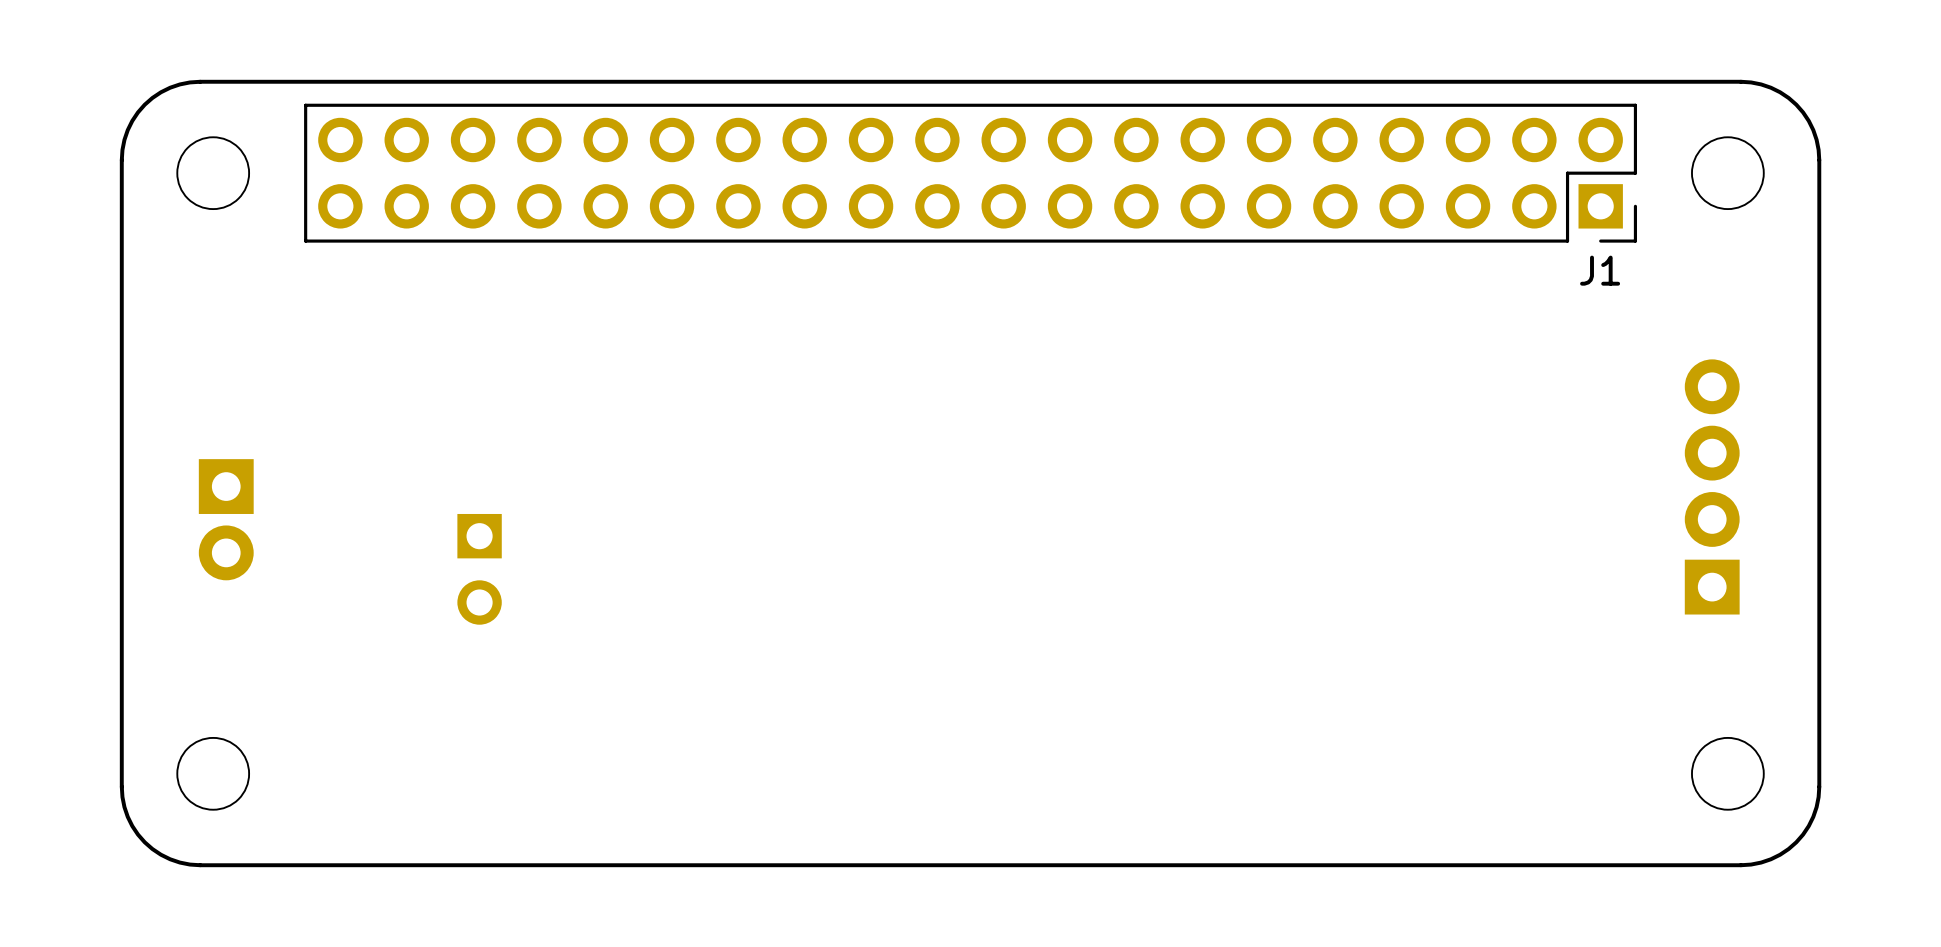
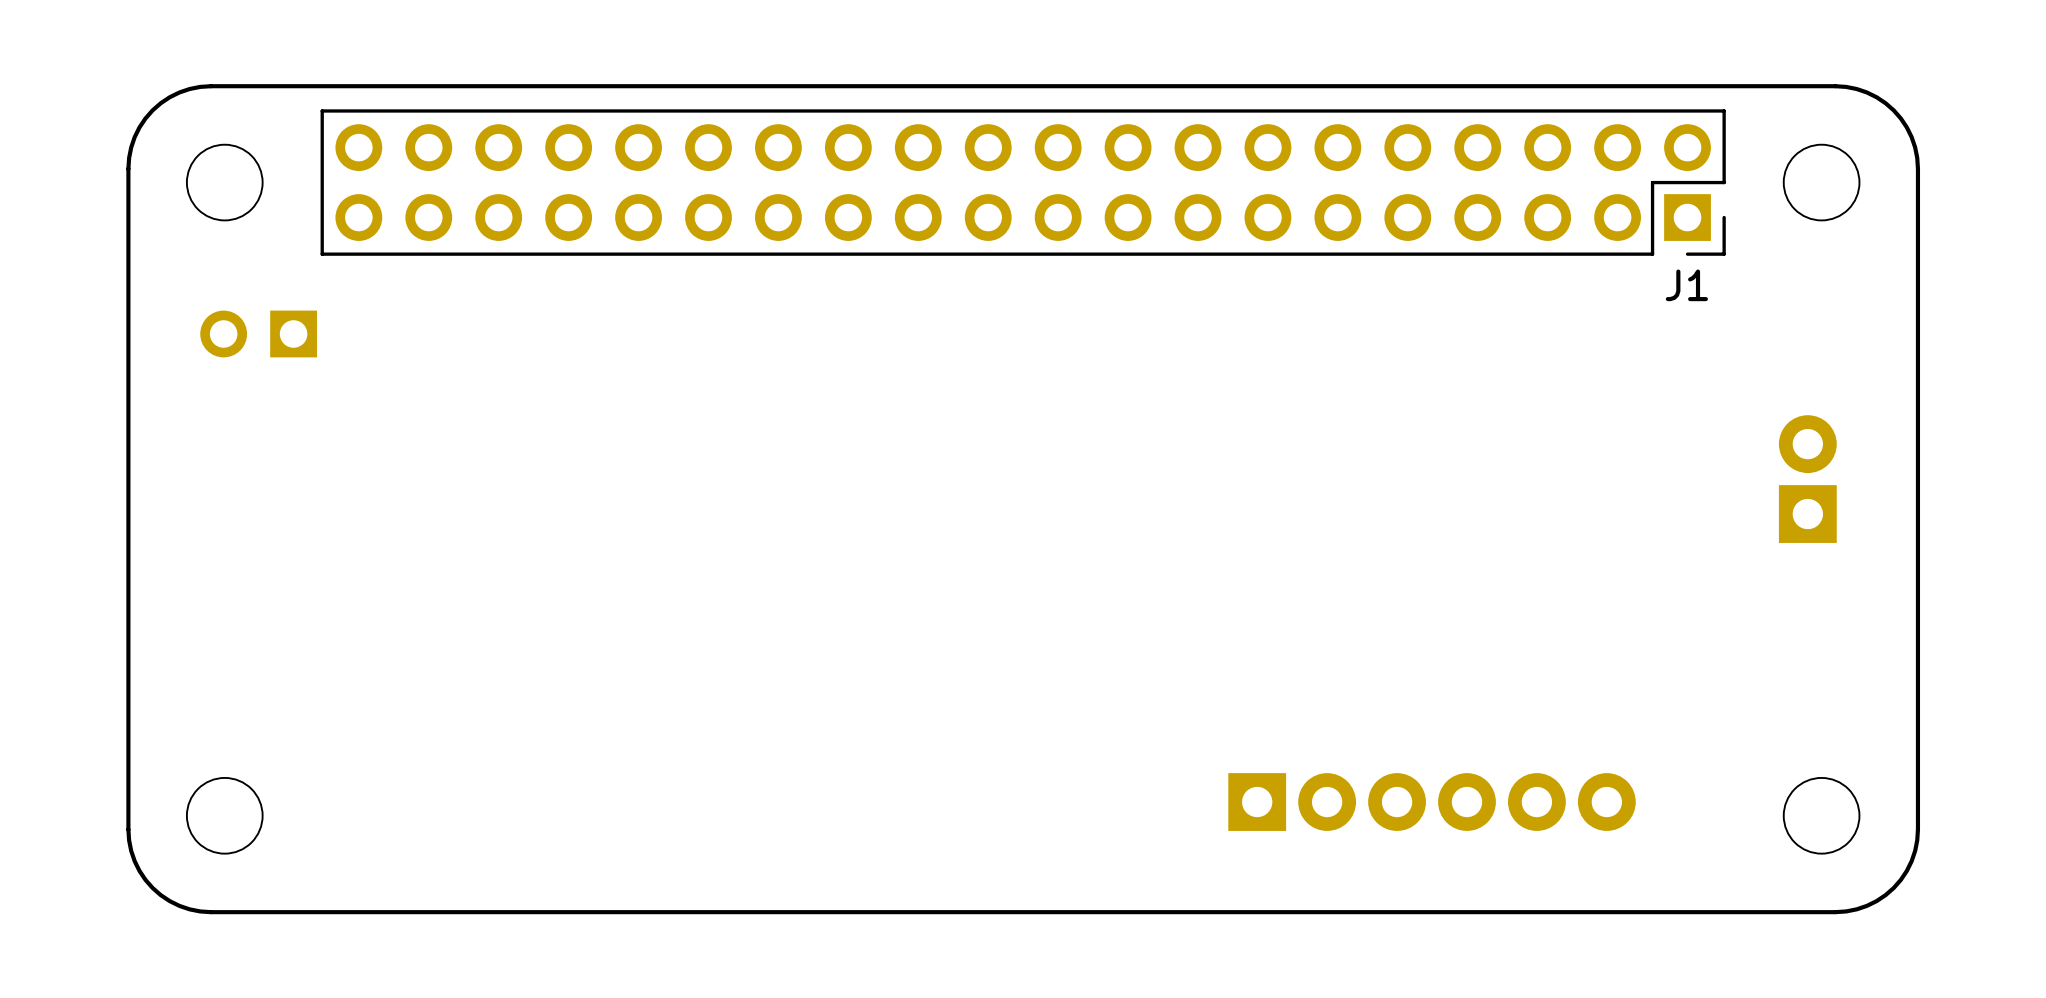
part: none -> (1807, 479)
part: (1712, 486) -> none
part: (226, 519) -> none
part rotation: 0° (479, 569) -> 90° clockwise (258, 333)
part position: (479, 569) -> (258, 333)
part: none -> (1432, 802)

